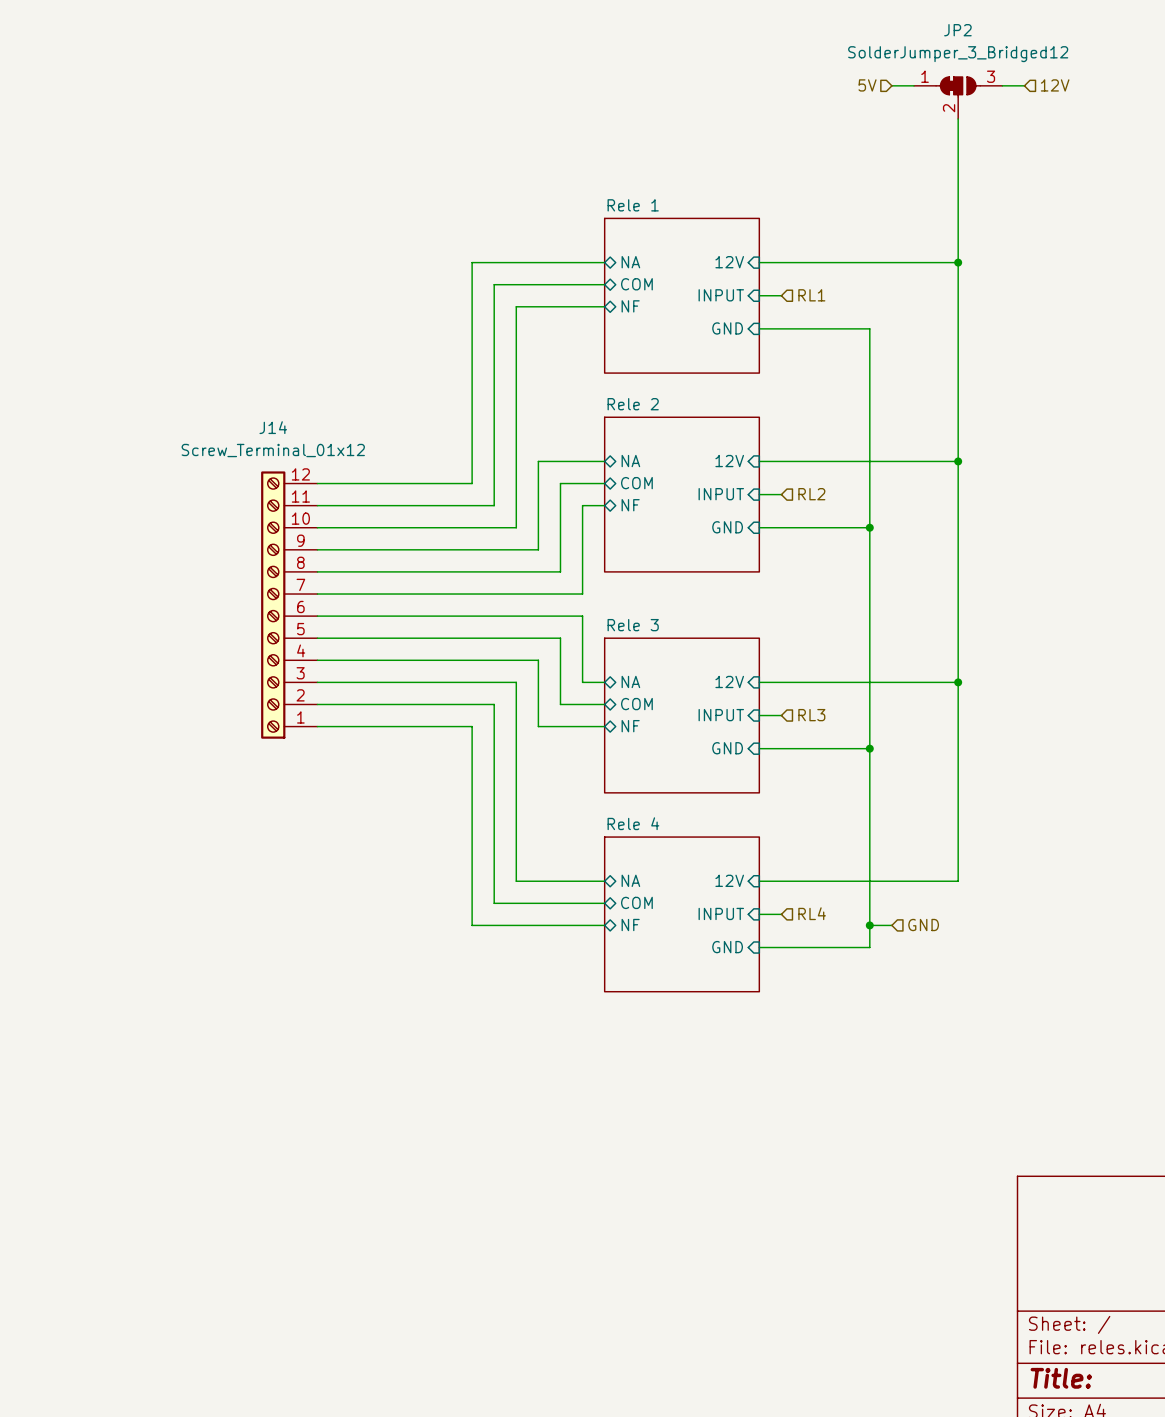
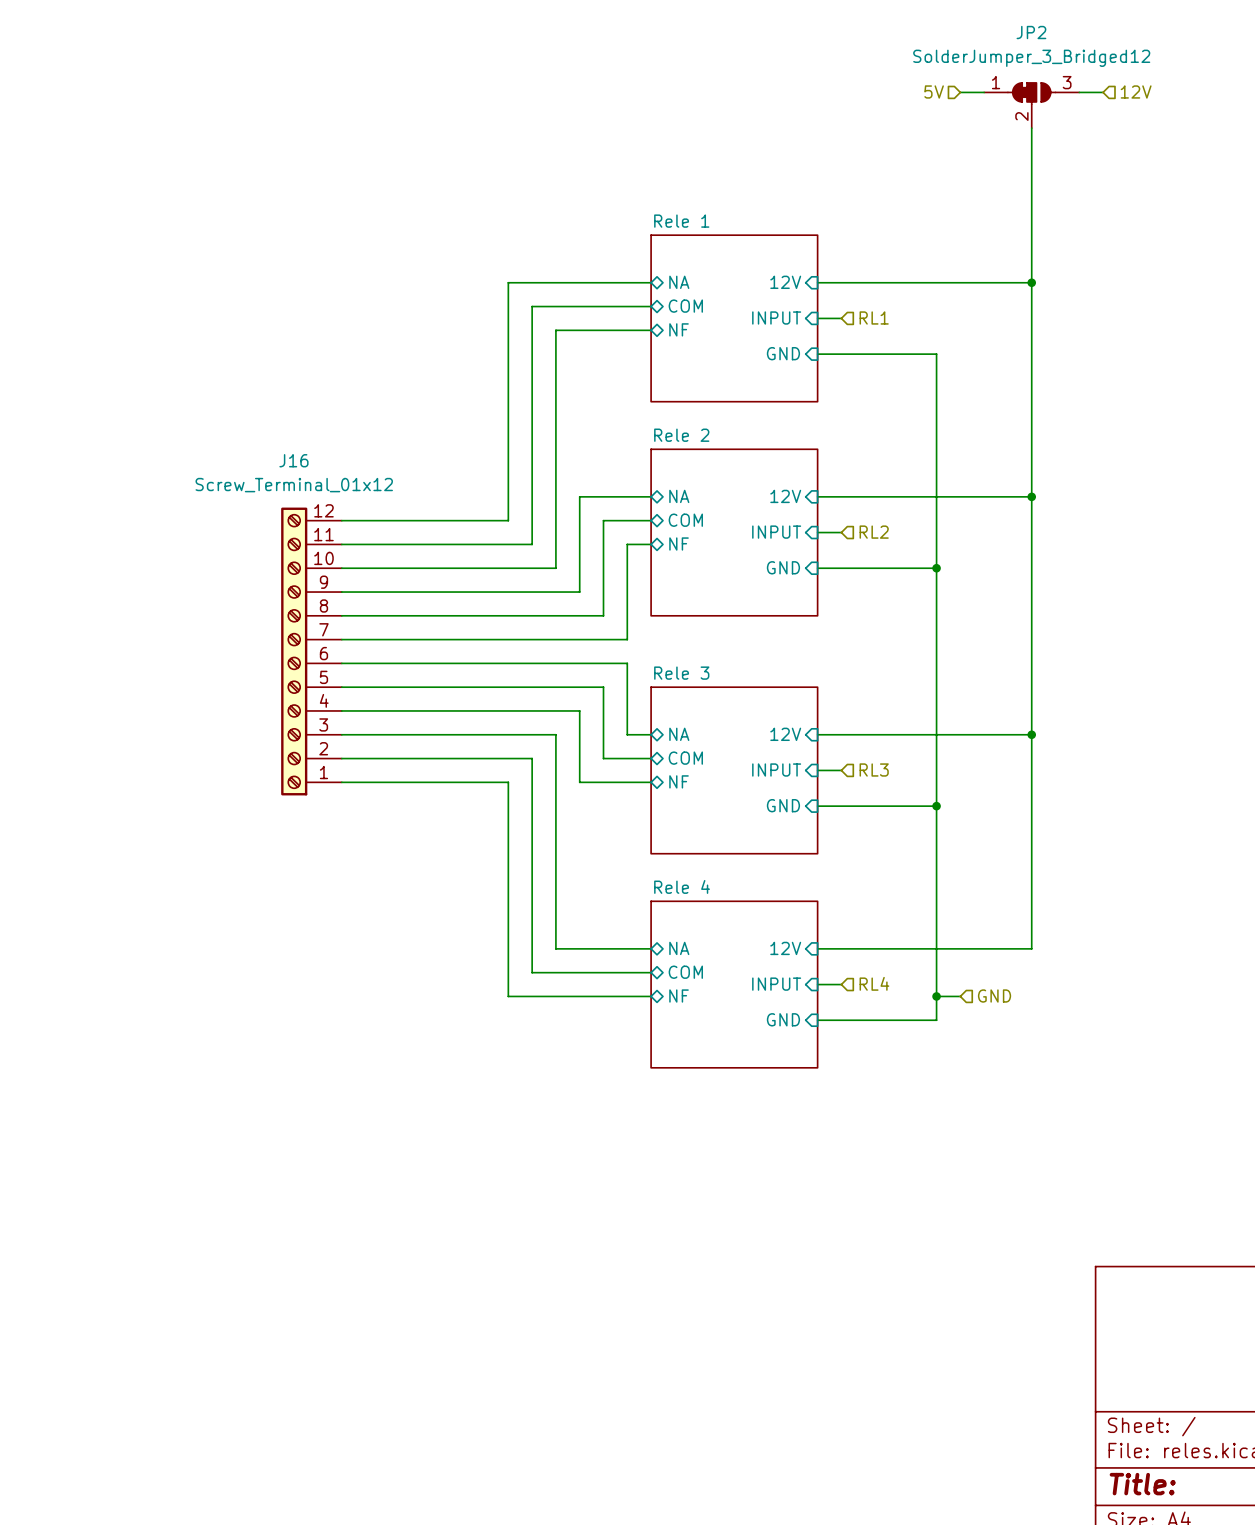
J14 name: J14 (273, 427) -> J16 (293, 460)

